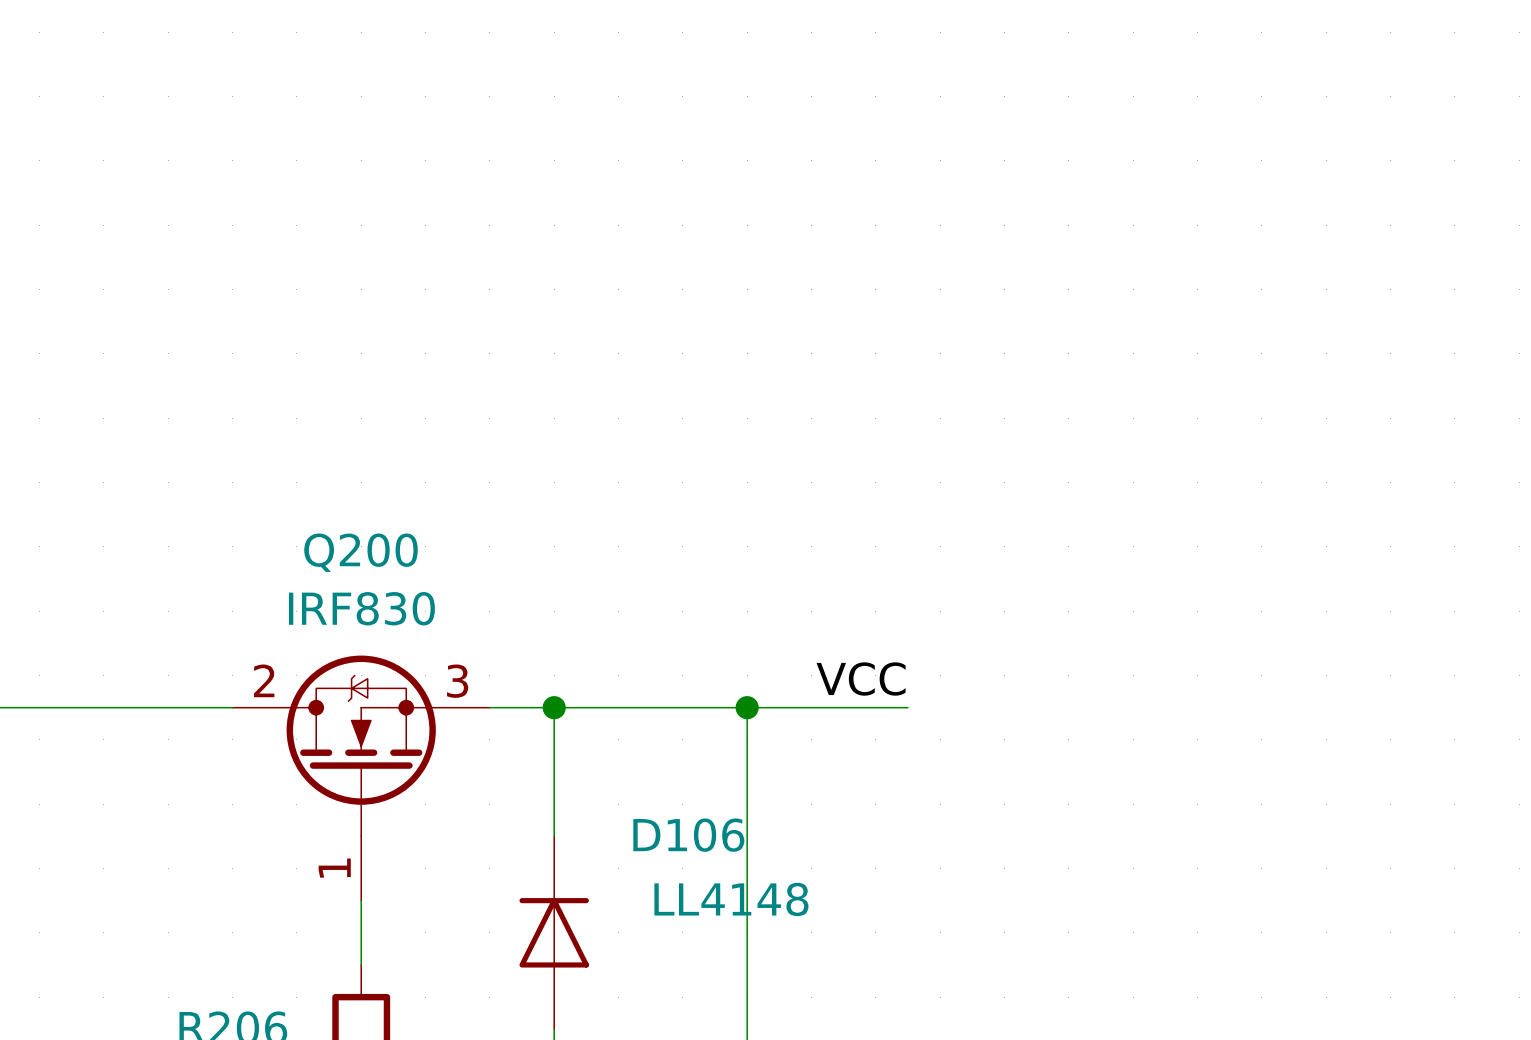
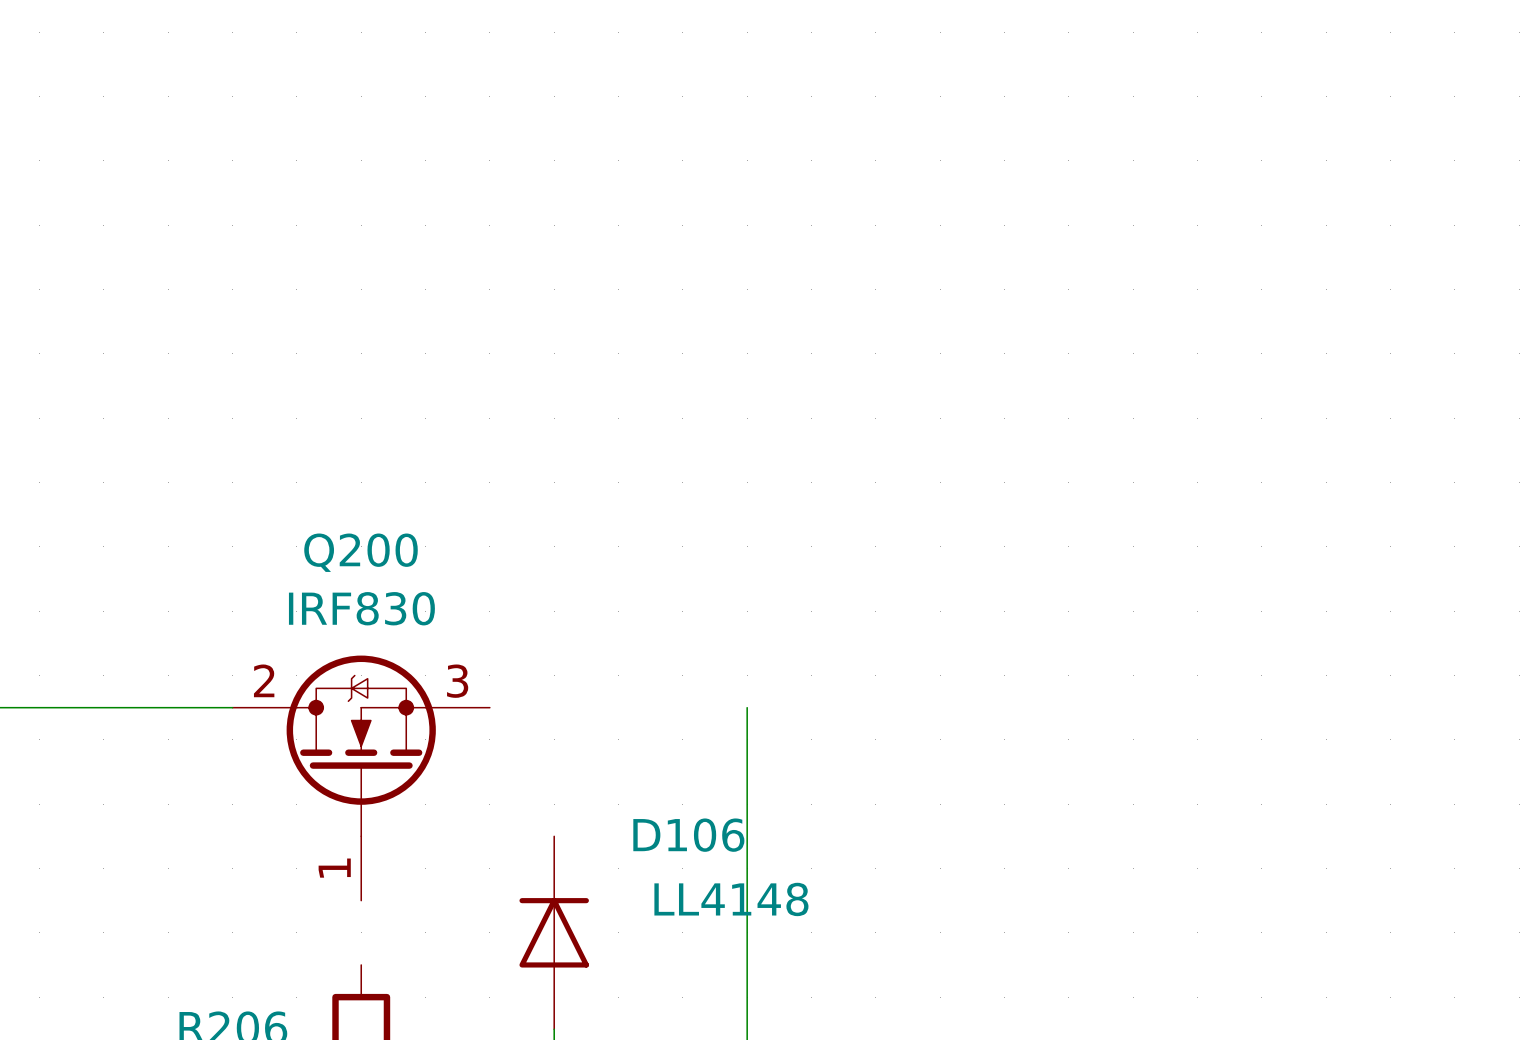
label: VCC (861, 679) -> none
wire: (489, 707) (907, 707) -> none
wire: (554, 707) (554, 836) -> none
junction: (554, 707) -> none
junction: (747, 707) -> none
wire: (361, 900) (361, 964) -> none

